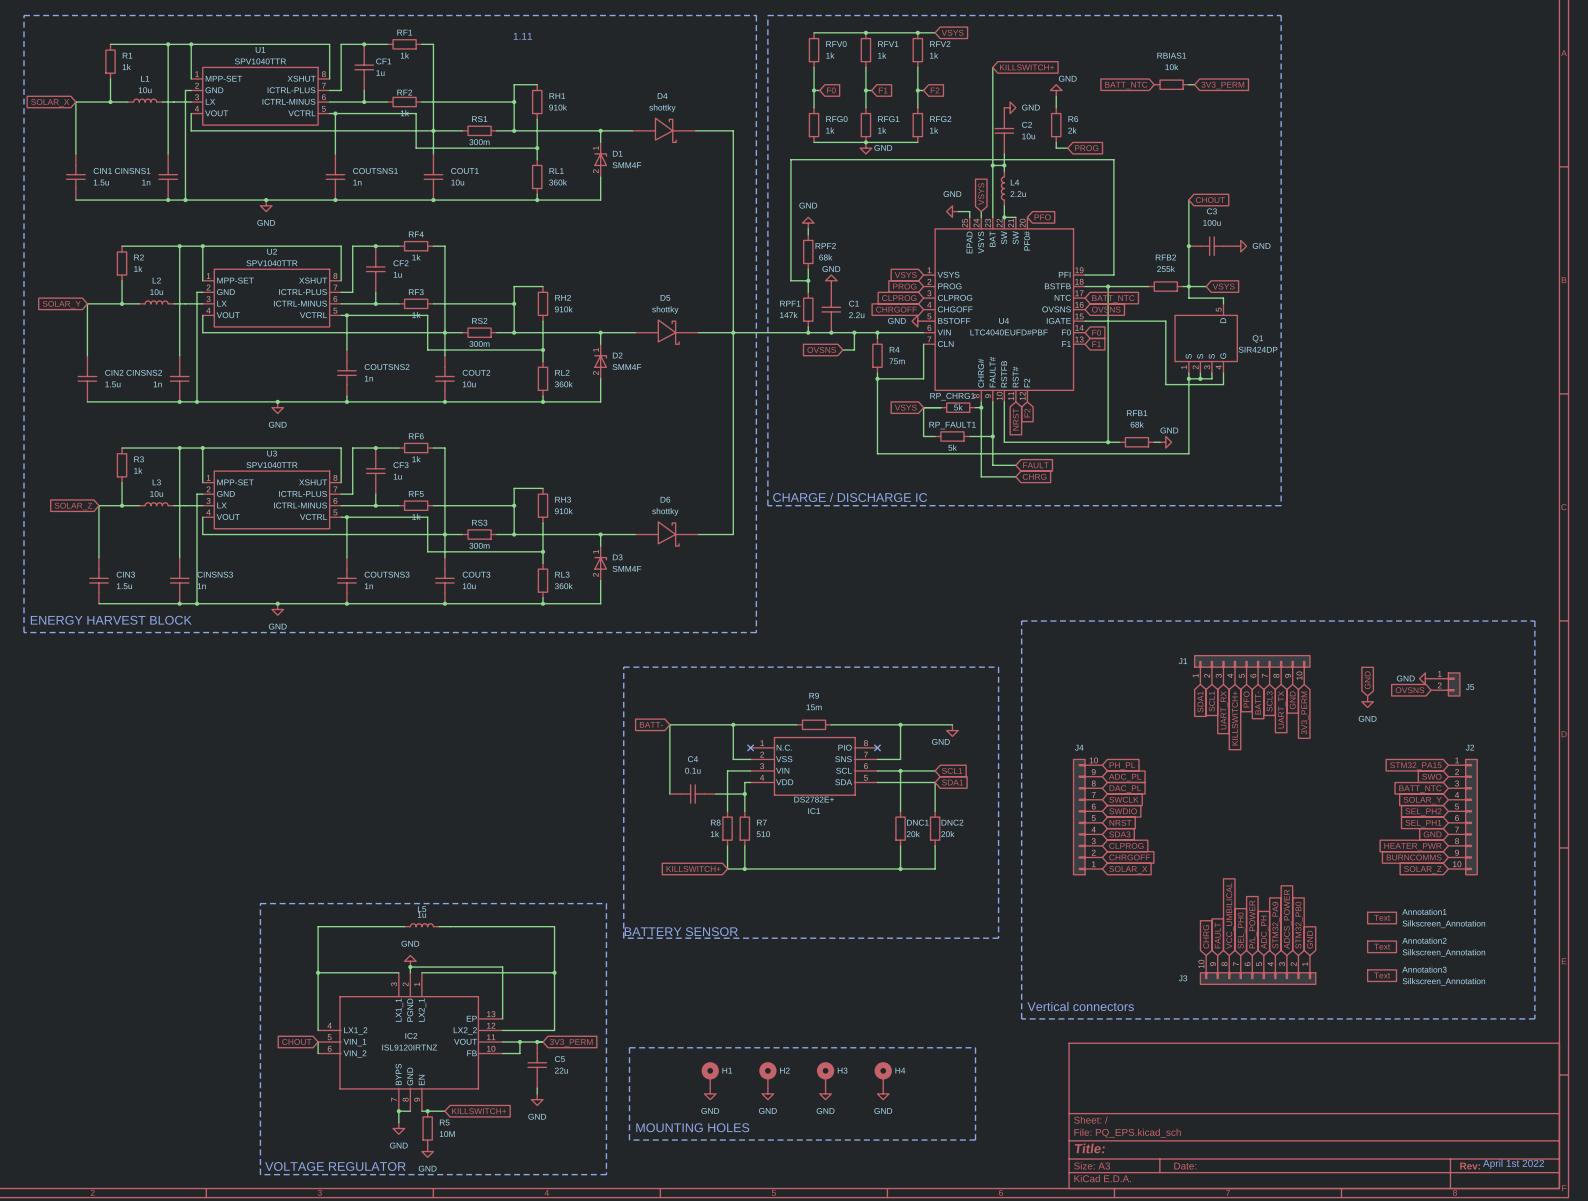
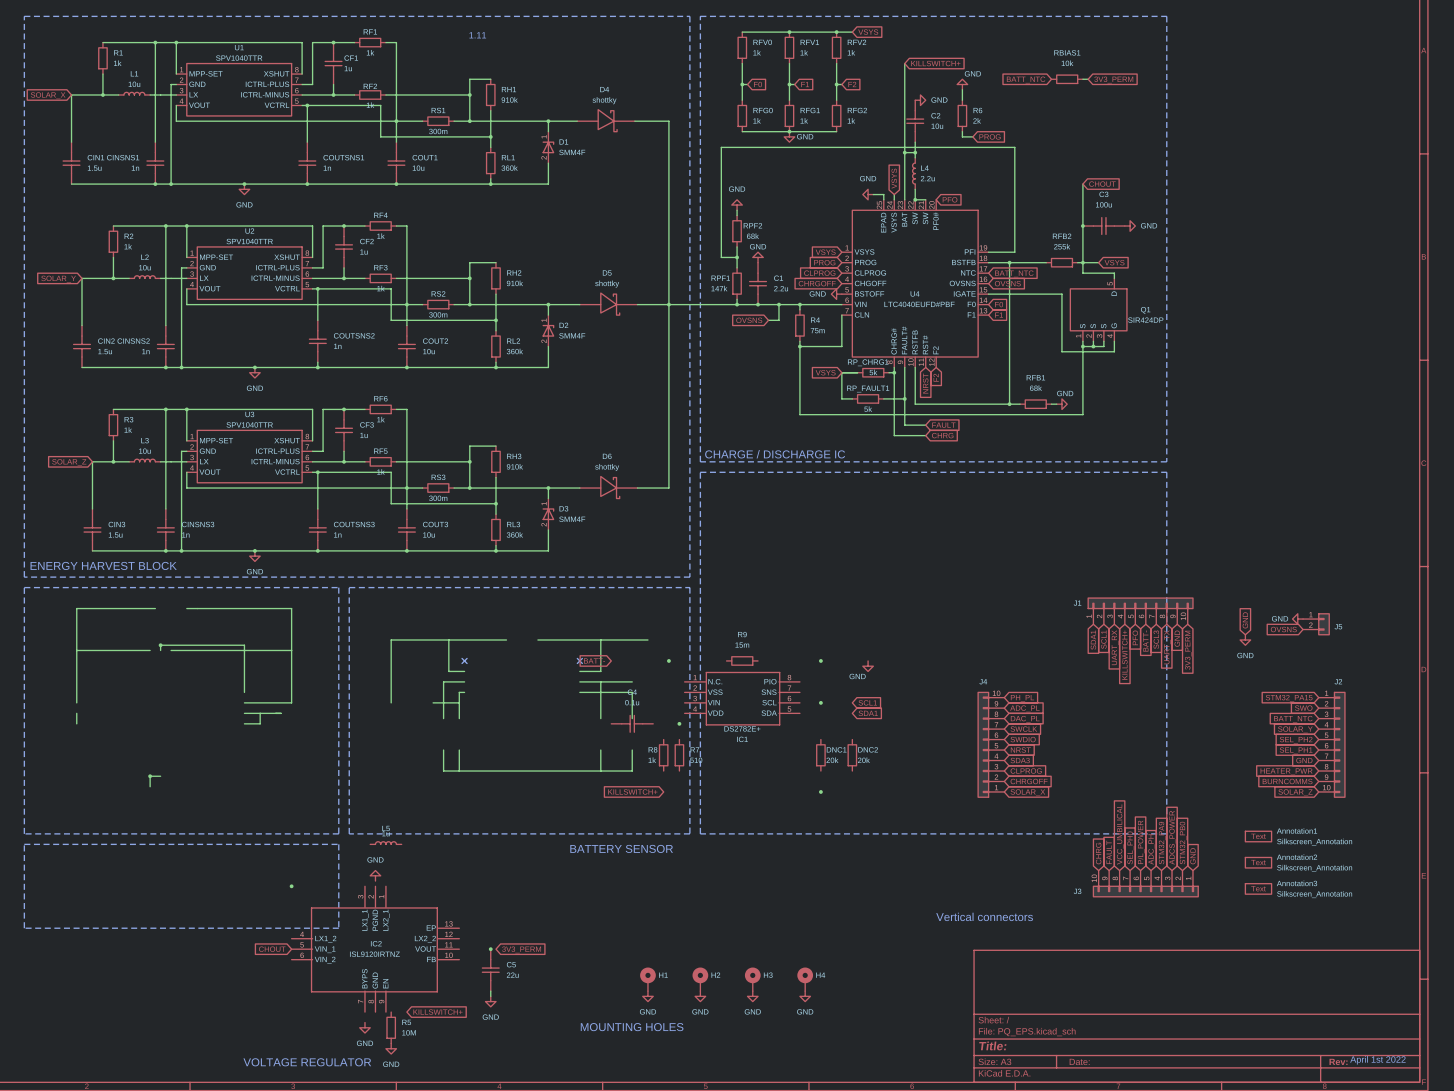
line: none -> (700, 472) (1166, 472) (1166, 833) (700, 833) (700, 472)
line: (1021, 621) (1534, 621) (1534, 1018) (1021, 1018) (1021, 621) -> none
line: none -> (24, 587) (338, 587) (338, 833) (24, 833) (24, 587)
line: none -> (349, 587) (689, 587) (689, 833) (349, 833) (349, 587)
wire: none -> (155, 608) (76, 608) (76, 702)
wire: none -> (186, 608) (291, 608) (291, 702) (244, 702)
line: (623, 667) (998, 667) (998, 938) (623, 938) (623, 667) -> none
wire: none -> (448, 640) (448, 671) (464, 671)
wire: none -> (506, 640) (391, 640) (391, 702)
wire: none -> (537, 640) (647, 640)
wire: none -> (600, 640) (600, 671) (579, 671)
junction: none -> (160, 645)
wire: none -> (76, 650) (150, 650)
wire: none -> (160, 650) (160, 645) (244, 645) (244, 692)
wire: none -> (171, 650) (291, 650)
no-connect mark: none -> (464, 660)
no-connect mark: none -> (579, 660)
wire: (733, 724) (733, 759) (750, 759) -> none
wire: (796, 724) (669, 724) (669, 794) -> none
wire: (831, 724) (952, 724) -> none
wire: (900, 724) (900, 759) (877, 759) -> none
wire: none -> (464, 681) (443, 681) (443, 718)
wire: none -> (579, 681) (632, 681)
wire: none -> (600, 681) (600, 718)
no-connect mark: (750, 747) -> none
no-connect mark: (877, 747) -> none
wire: none -> (464, 692) (459, 692) (459, 718)
wire: none -> (579, 692) (632, 692) (632, 718)
wire: none -> (433, 702) (459, 702)
wire: (750, 770) (727, 770) (727, 811) -> none
wire: (877, 770) (935, 770) -> none
wire: (900, 770) (900, 811) -> none
wire: none -> (76, 713) (76, 723)
wire: none -> (244, 713) (281, 713)
wire: none -> (260, 713) (260, 723) (244, 723)
wire: (750, 782) (744, 782) (744, 811) -> none
wire: (877, 782) (935, 782) (935, 811) -> none
wire: (716, 794) (744, 794) -> none
wire: none -> (443, 750) (443, 771) (632, 771) (632, 750)
wire: none -> (459, 750) (459, 771)
wire: (727, 845) (727, 868) (935, 868) (935, 845) -> none
wire: (744, 845) (744, 868) -> (600, 750) (600, 771)
wire: (900, 845) (900, 868) -> none
junction: none -> (150, 776)
wire: none -> (160, 776) (150, 776) (150, 786)
junction: (744, 868) -> none
line: (260, 903) (606, 903) (606, 1174) (260, 1174) (260, 903) -> none
line: none -> (24, 844) (24, 928) (338, 928) (338, 844) (24, 844)
wire: (404, 926) (318, 926) (318, 1030) -> none
wire: (439, 926) (554, 926) (554, 1030) (502, 1030) -> none
junction: (410, 967) -> none
wire: (318, 972) (398, 972) -> none
wire: (410, 972) (410, 967) (502, 967) (502, 1018) -> none
wire: (421, 972) (554, 972) -> none
junction: (554, 972) -> none
wire: (318, 1042) (318, 1053) -> none
wire: (502, 1042) (543, 1042) -> none
wire: (519, 1042) (519, 1053) (502, 1053) -> none
junction: (519, 1042) -> none
line: (629, 1047) (975, 1047) (975, 1140) (629, 1140) (629, 1047) -> none
junction: (398, 1111) -> none
wire: (410, 1111) (398, 1111) (398, 1122) -> none
wire: (421, 1111) (444, 1111) -> none
junction: (427, 1111) -> none

